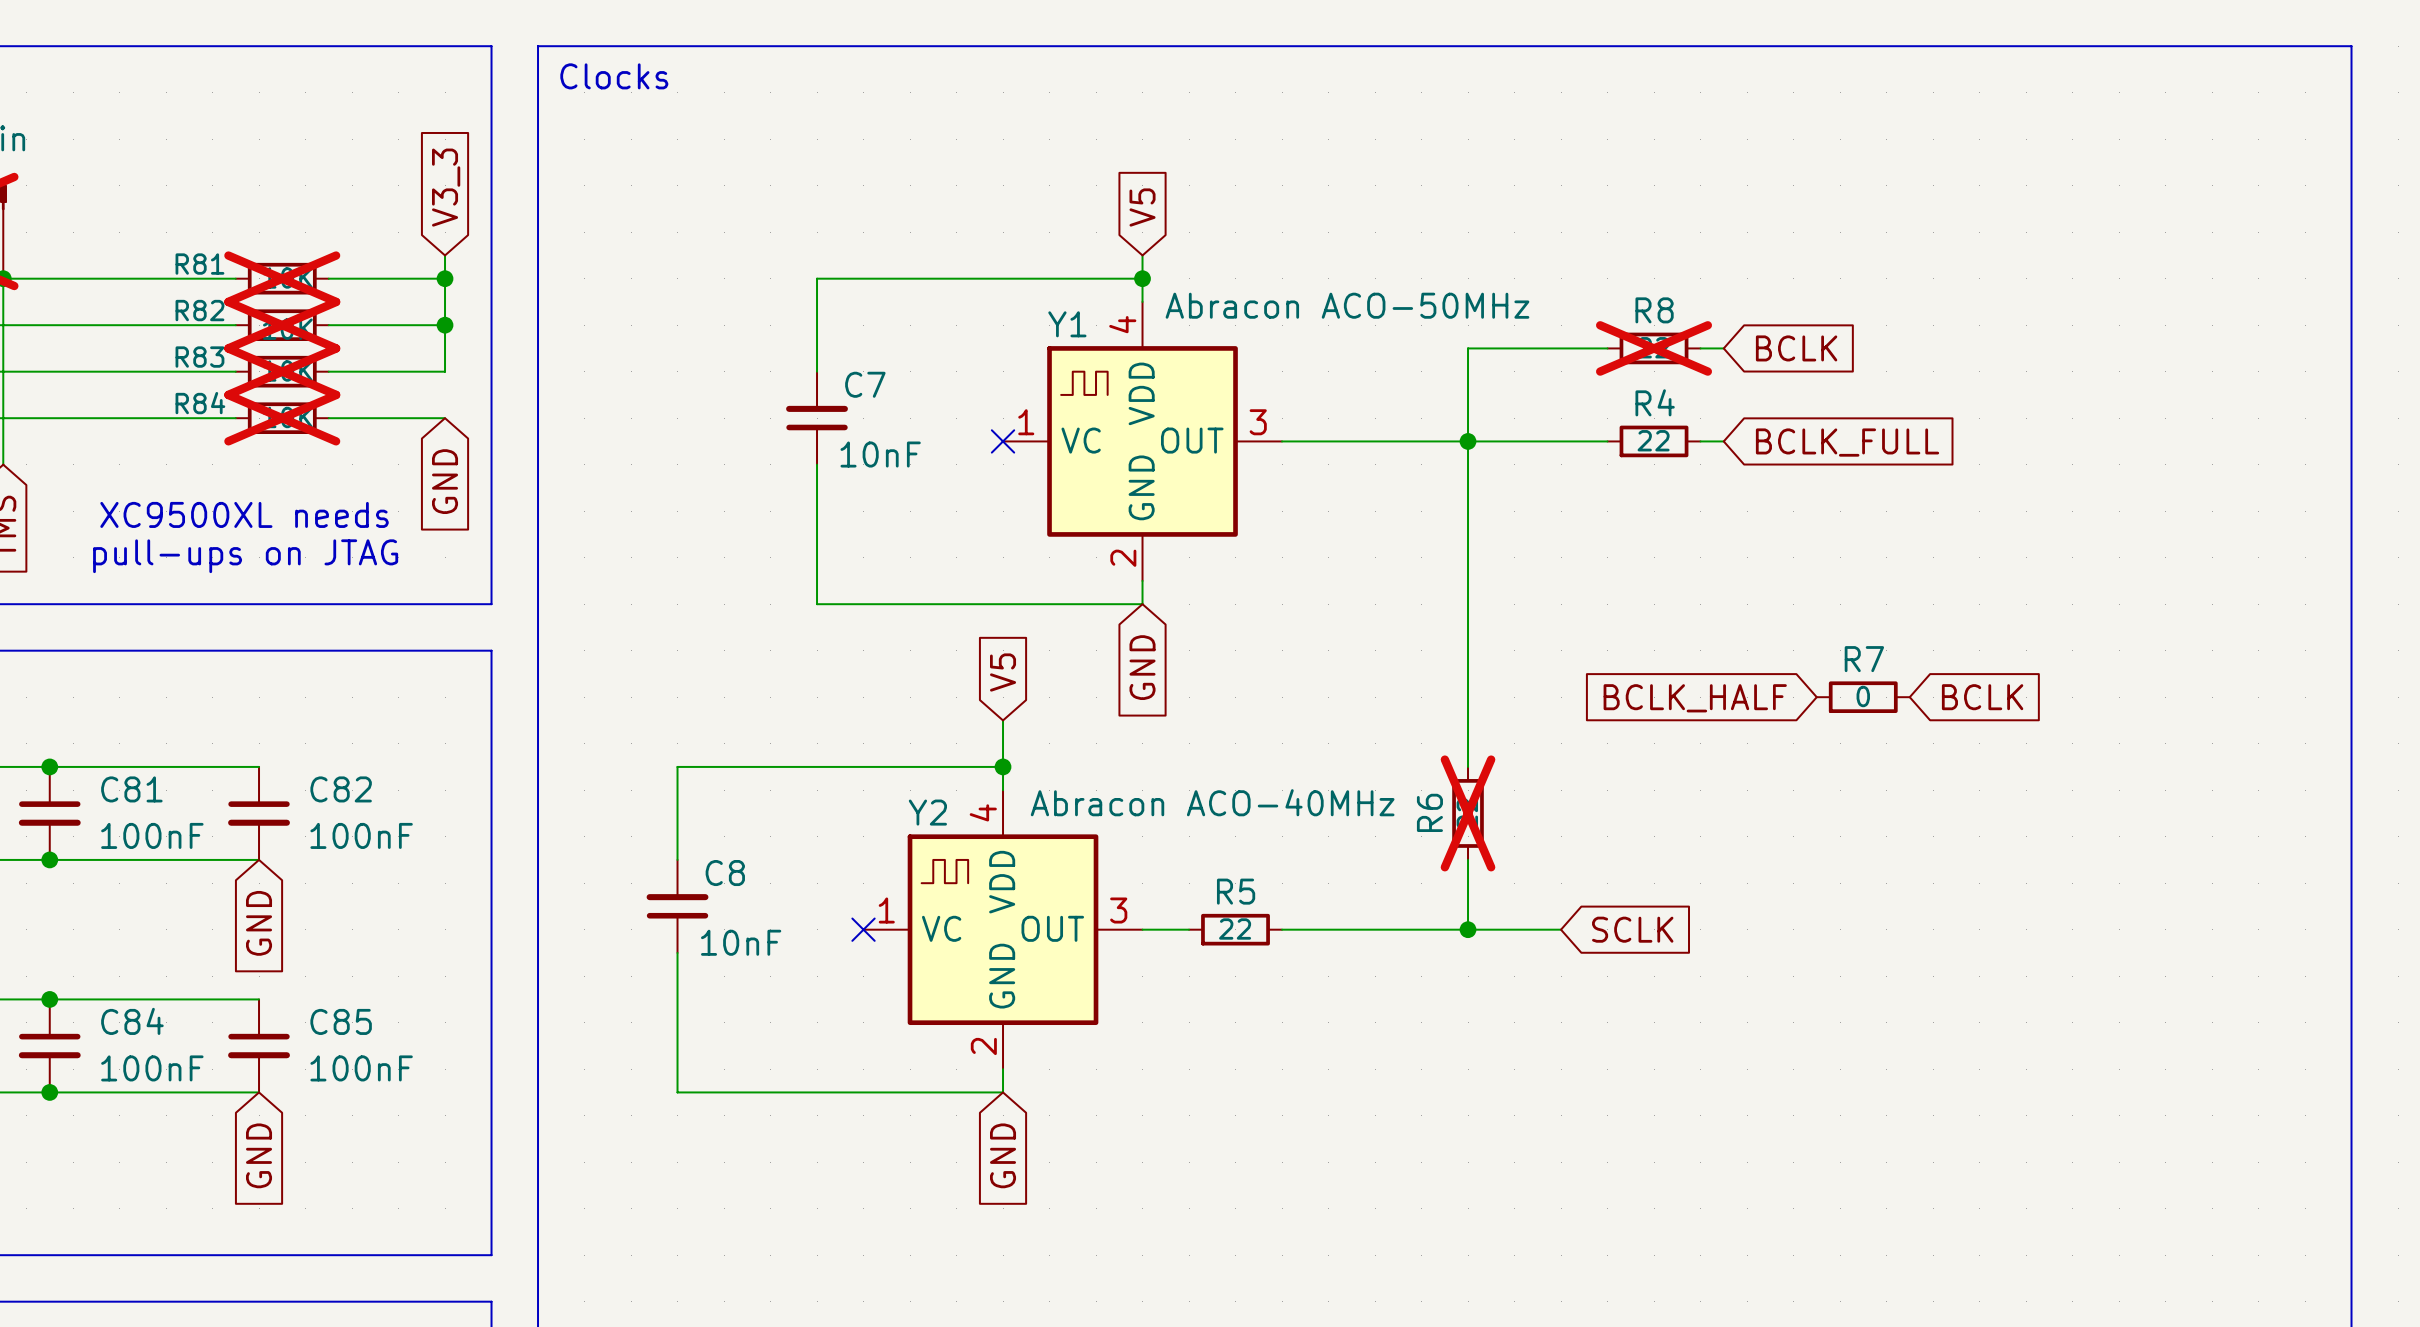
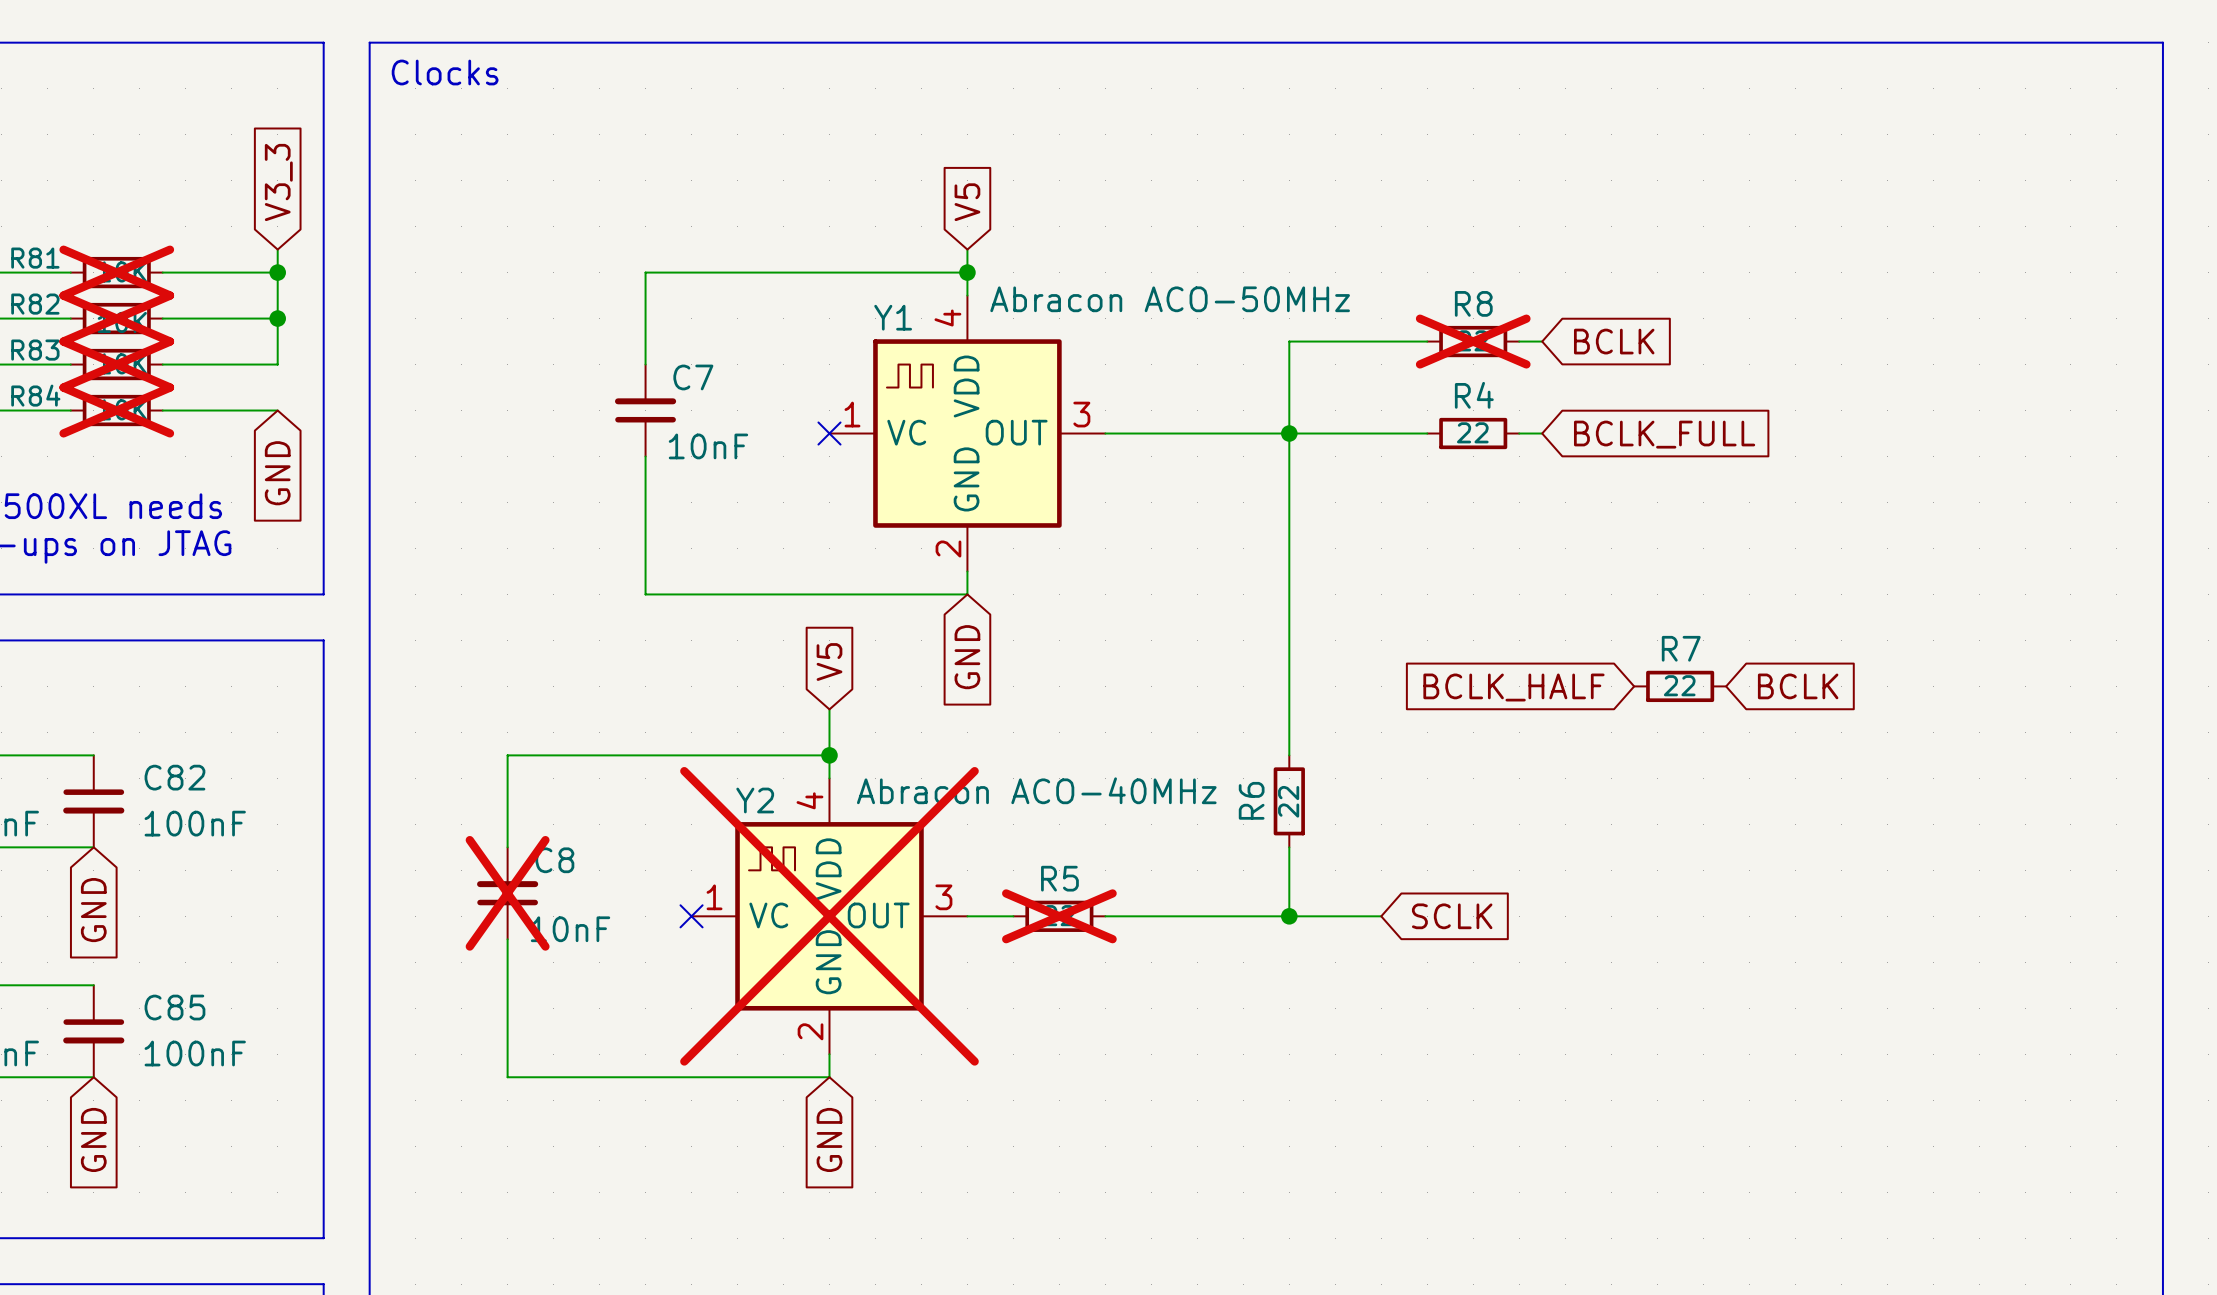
R7 value: 0 (1863, 696) -> 22 (1679, 685)
R6 do-not-place cross: (1468, 813) -> none
C8 do-not-place cross: none -> (507, 893)
Y2 do-not-place cross: none -> (829, 916)
R5 do-not-place cross: none -> (1059, 916)

